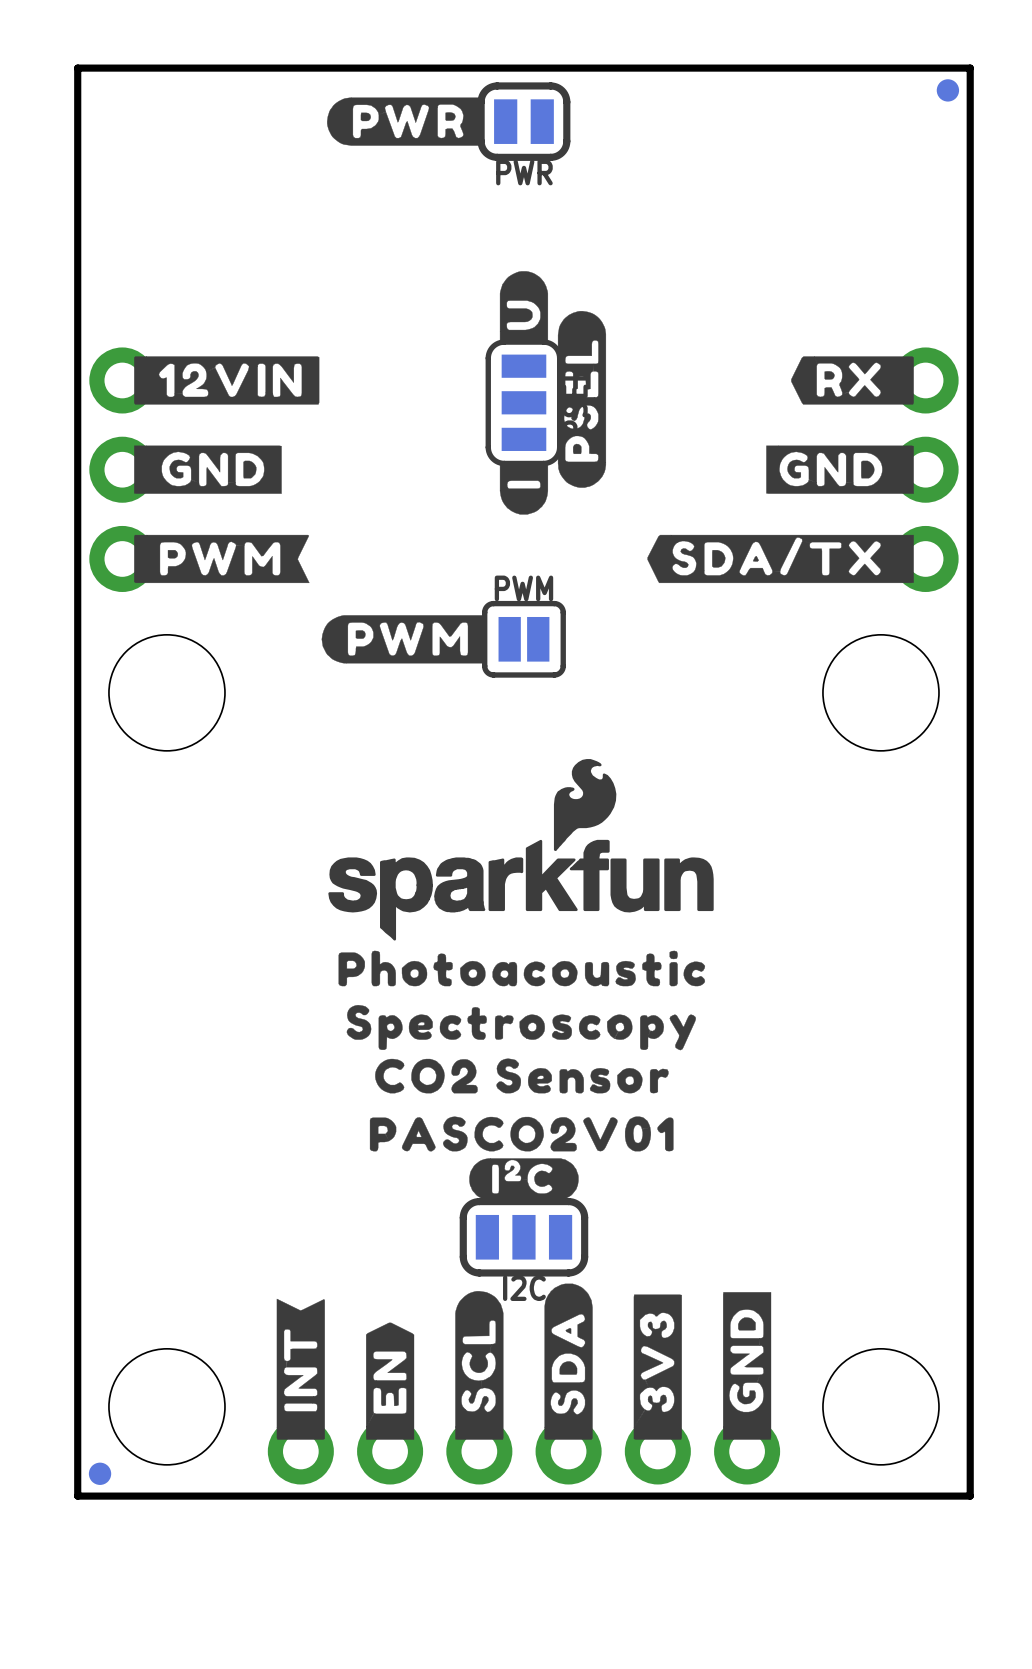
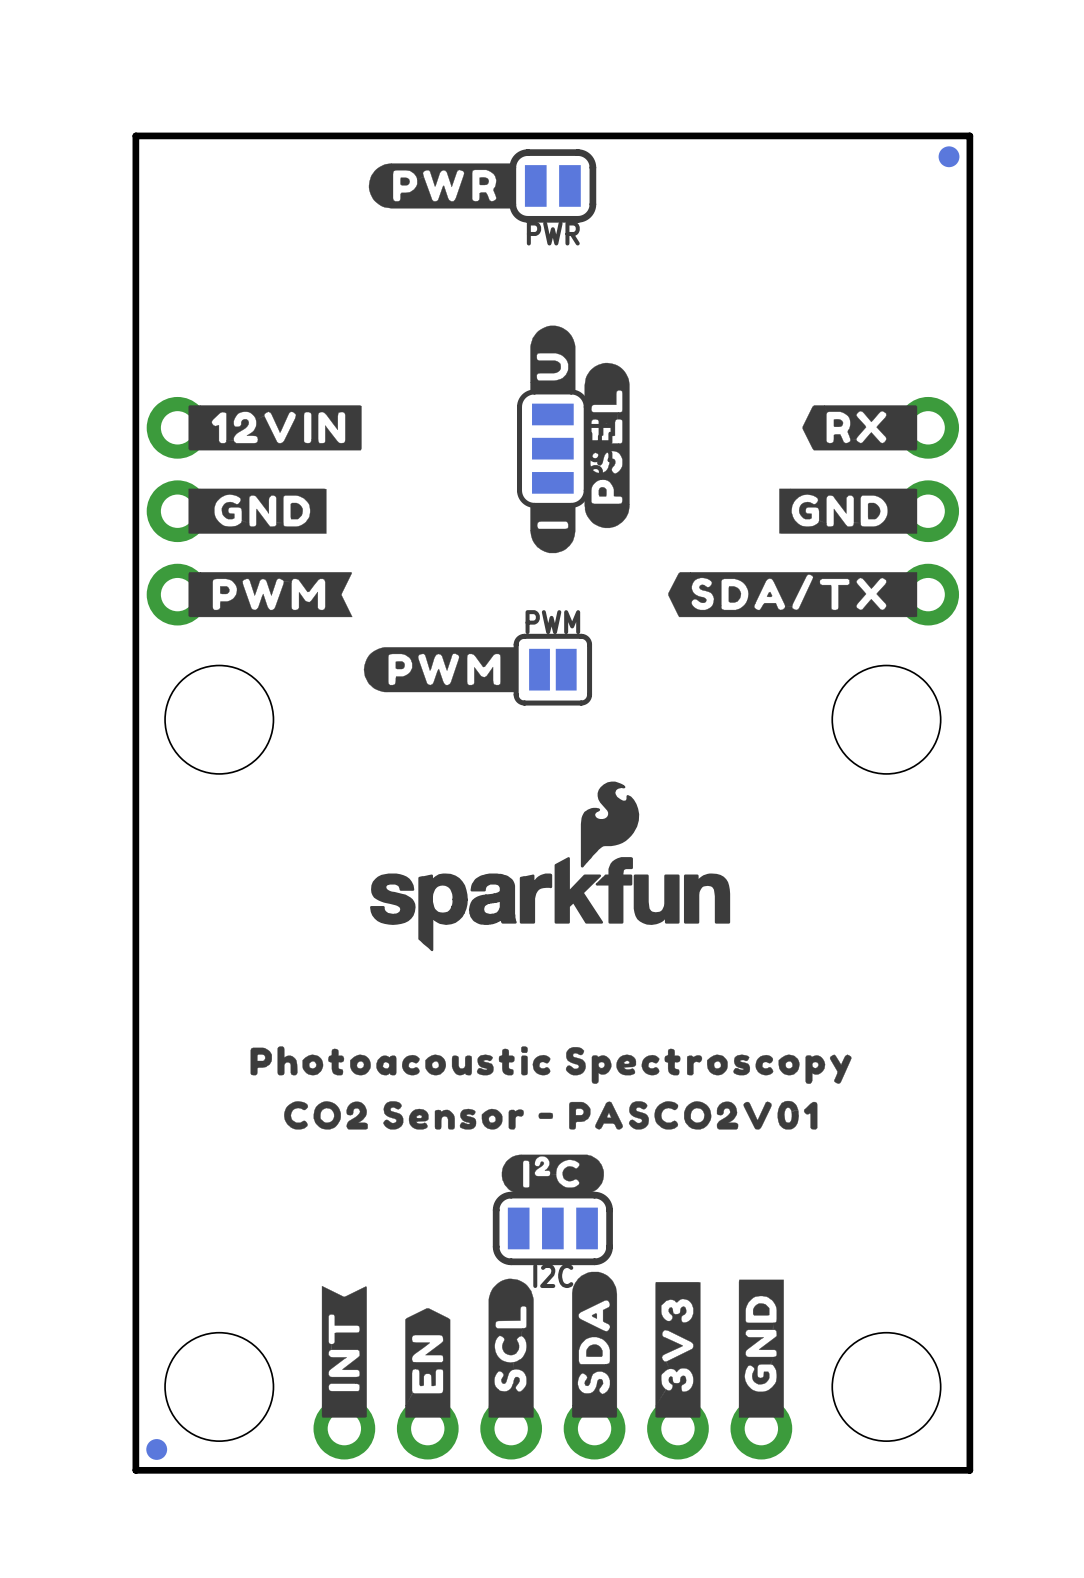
drawing: [338, 950, 706, 1051] -> none
drawing shape: [375, 1058, 669, 1094] -> [250, 1046, 852, 1084]
drawing shape: [369, 1116, 674, 1152] -> [284, 1100, 818, 1130]

